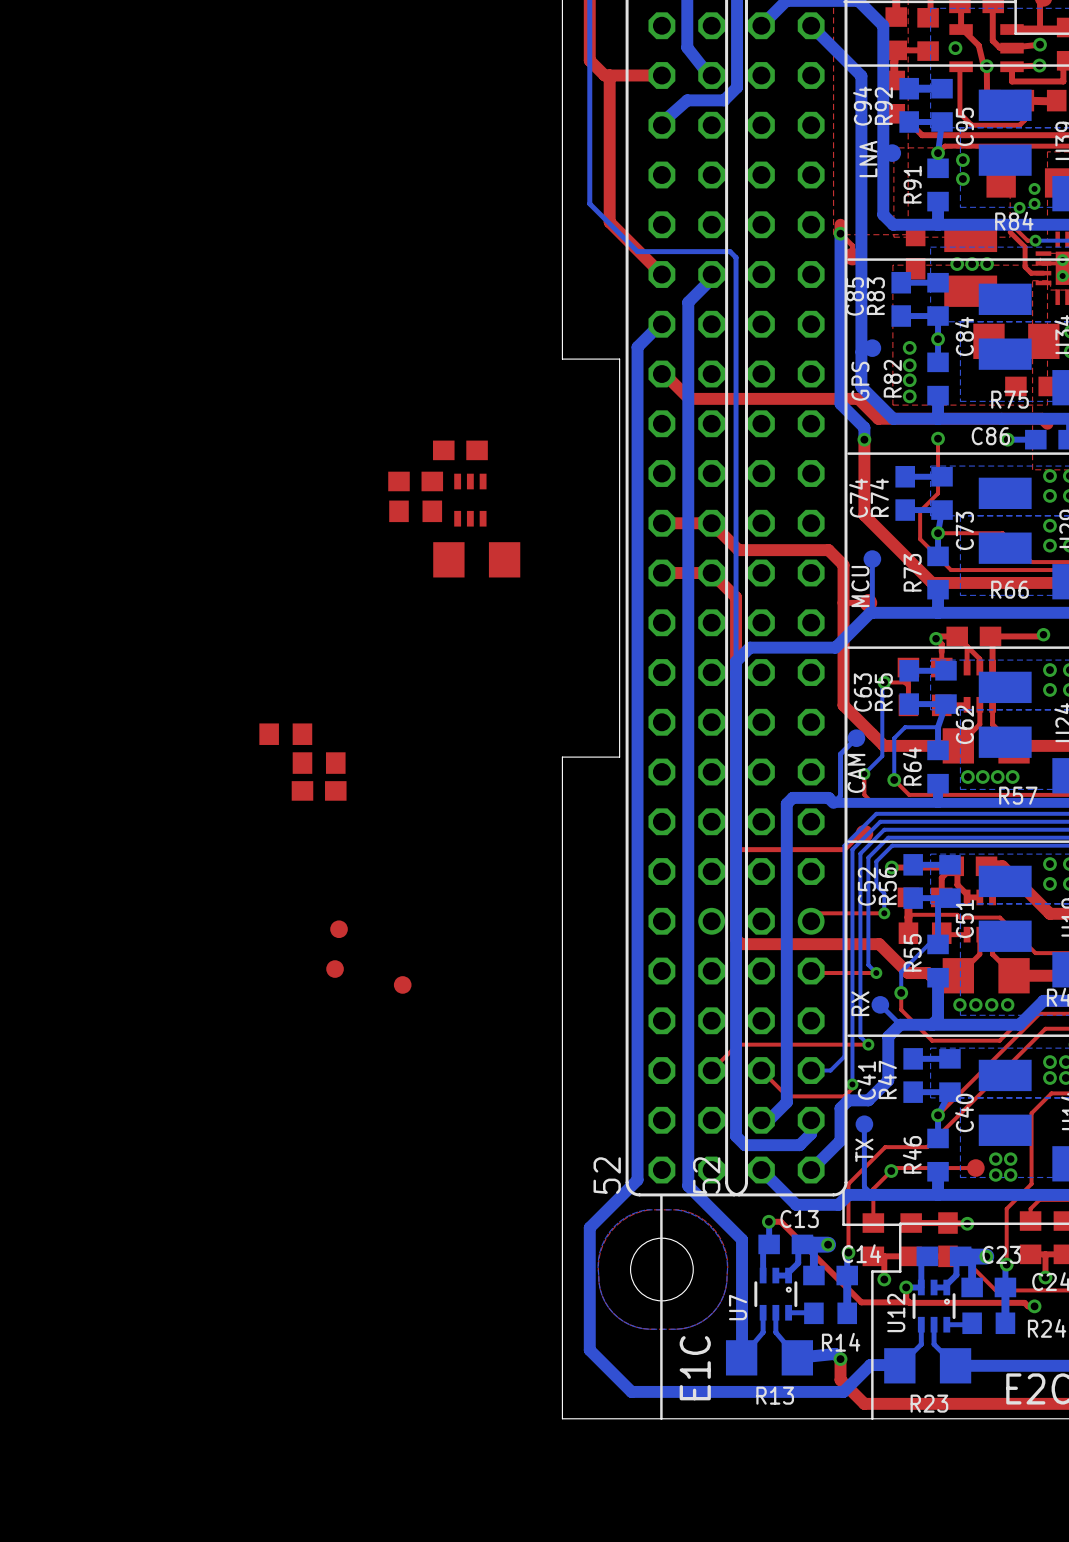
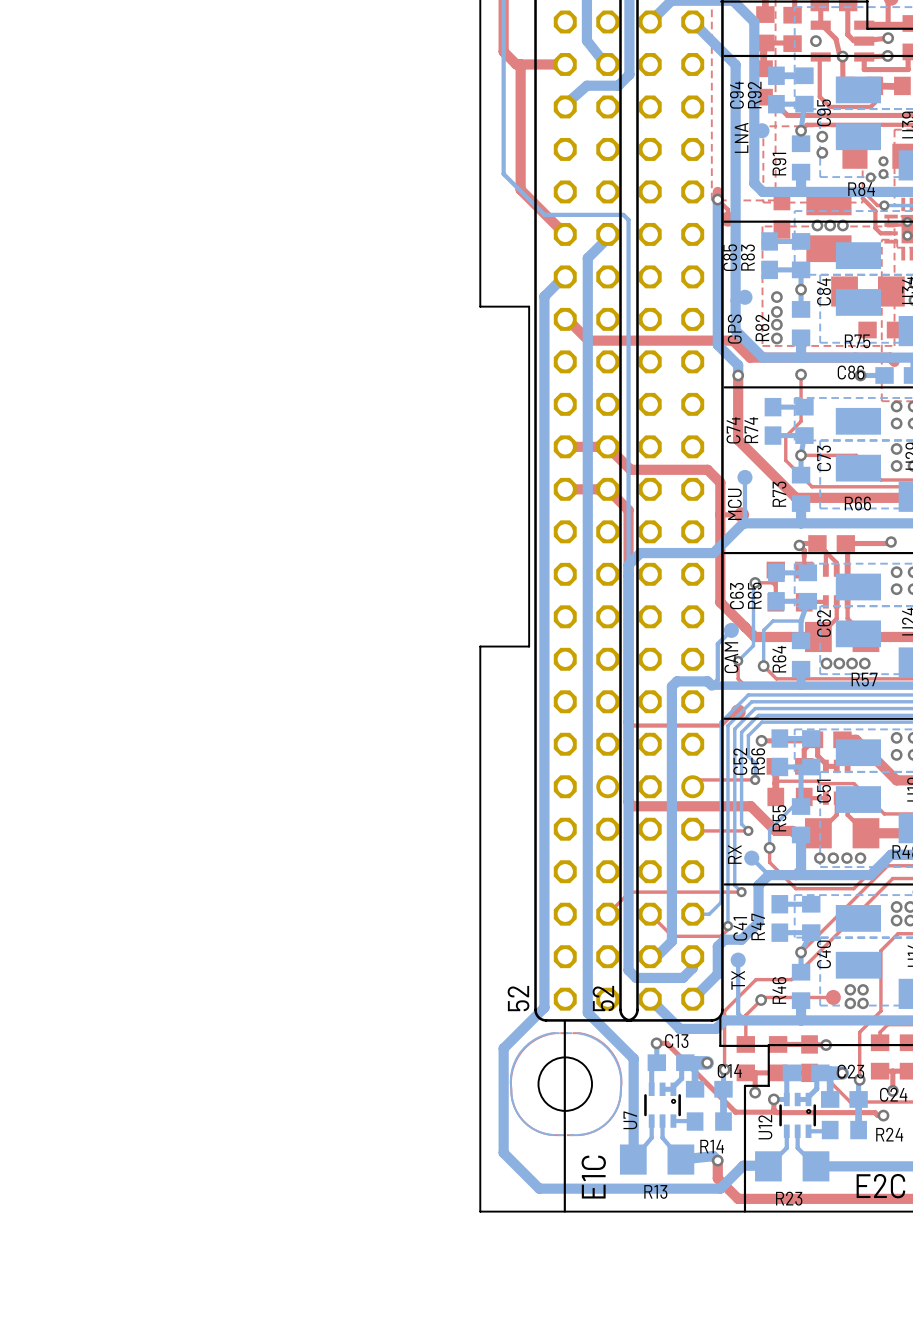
part: (460, 450) -> none
part: (415, 481) -> none
part: (470, 500) -> none
part: (415, 511) -> none
part: (476, 559) -> none
part: (285, 734) -> none
part: (319, 763) -> none
part: (319, 790) -> none
part: (339, 929) -> none
part: (335, 969) -> none
part: (402, 984) -> none

